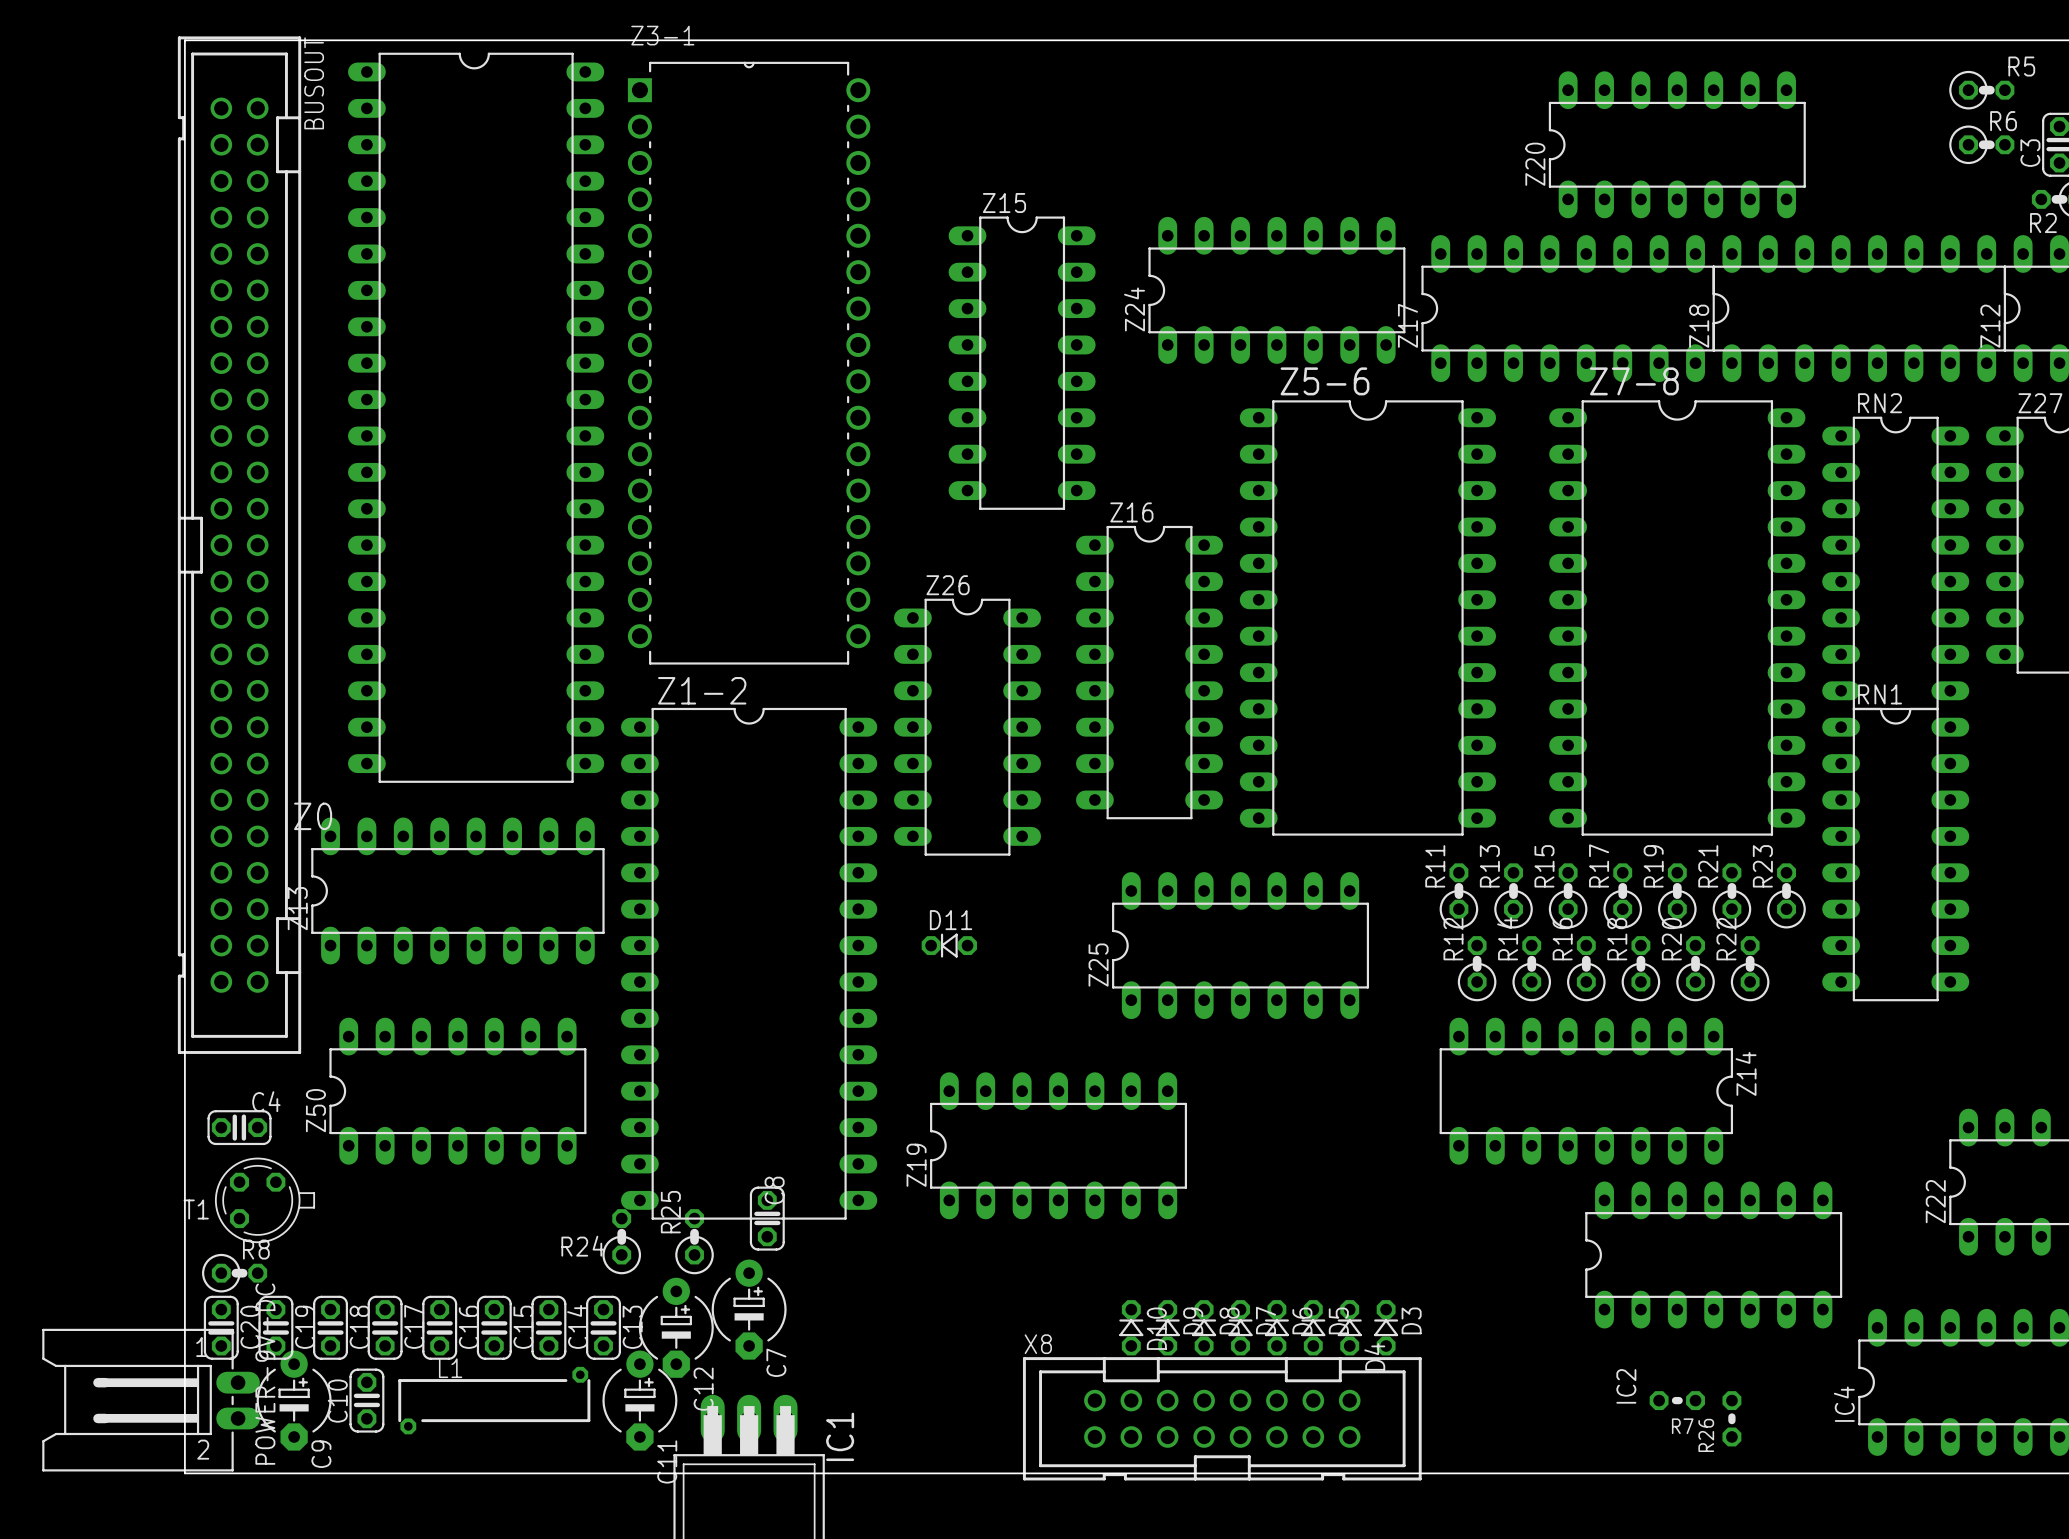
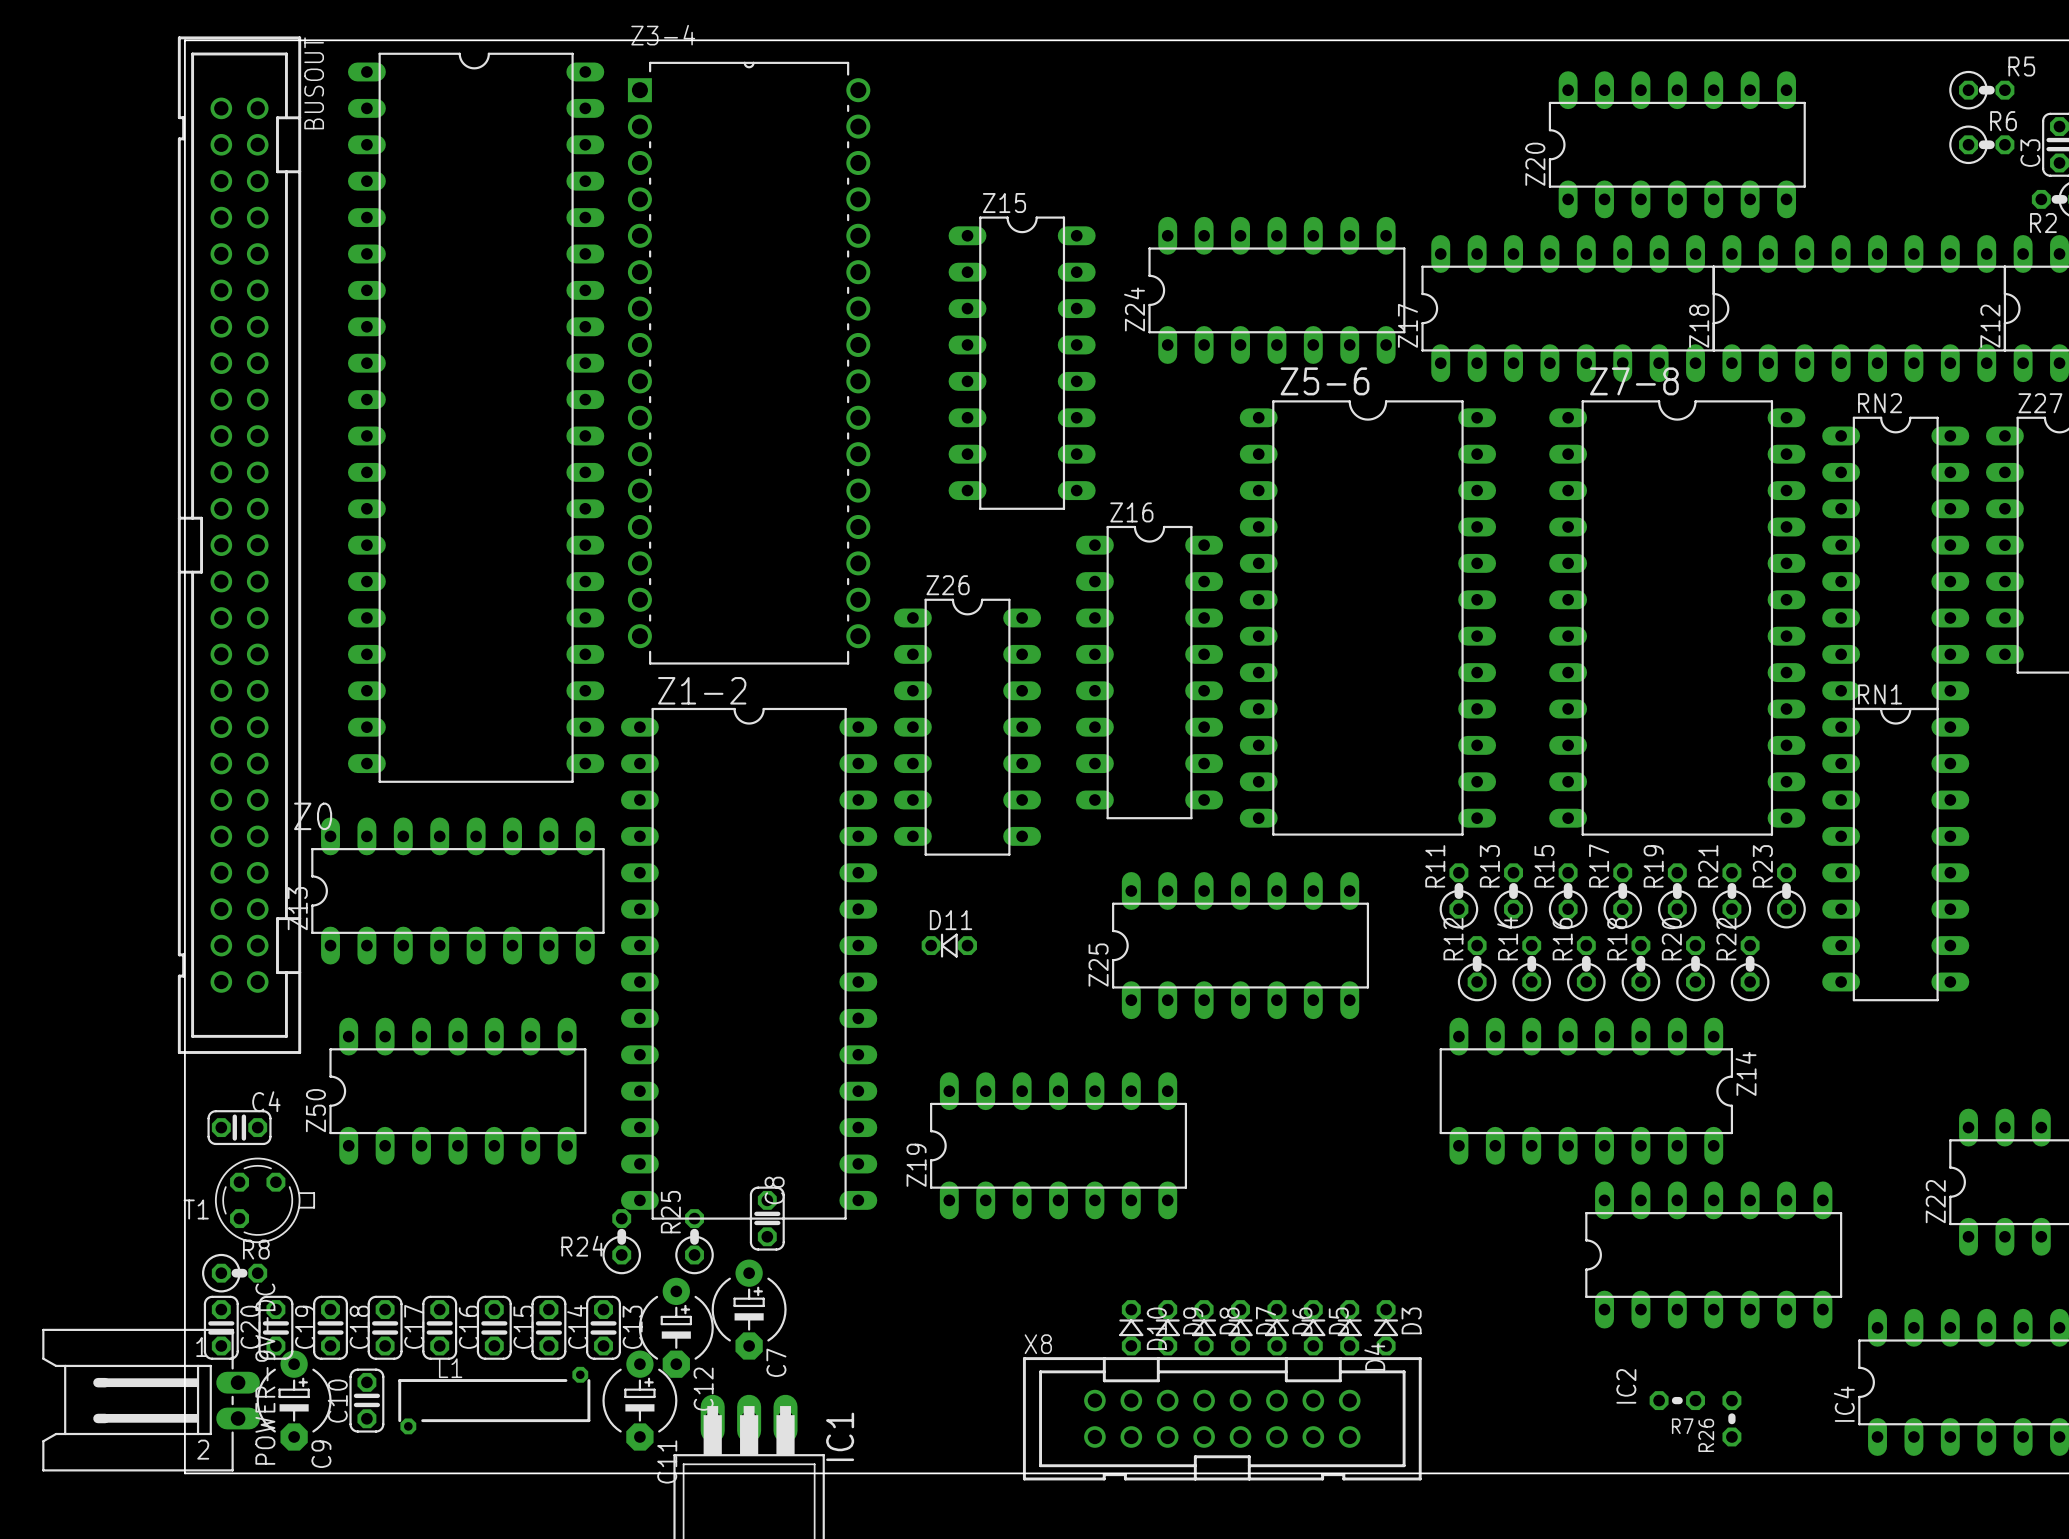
Z3-1 name: Z3-1 (662, 35) -> Z3-4 (663, 35)

